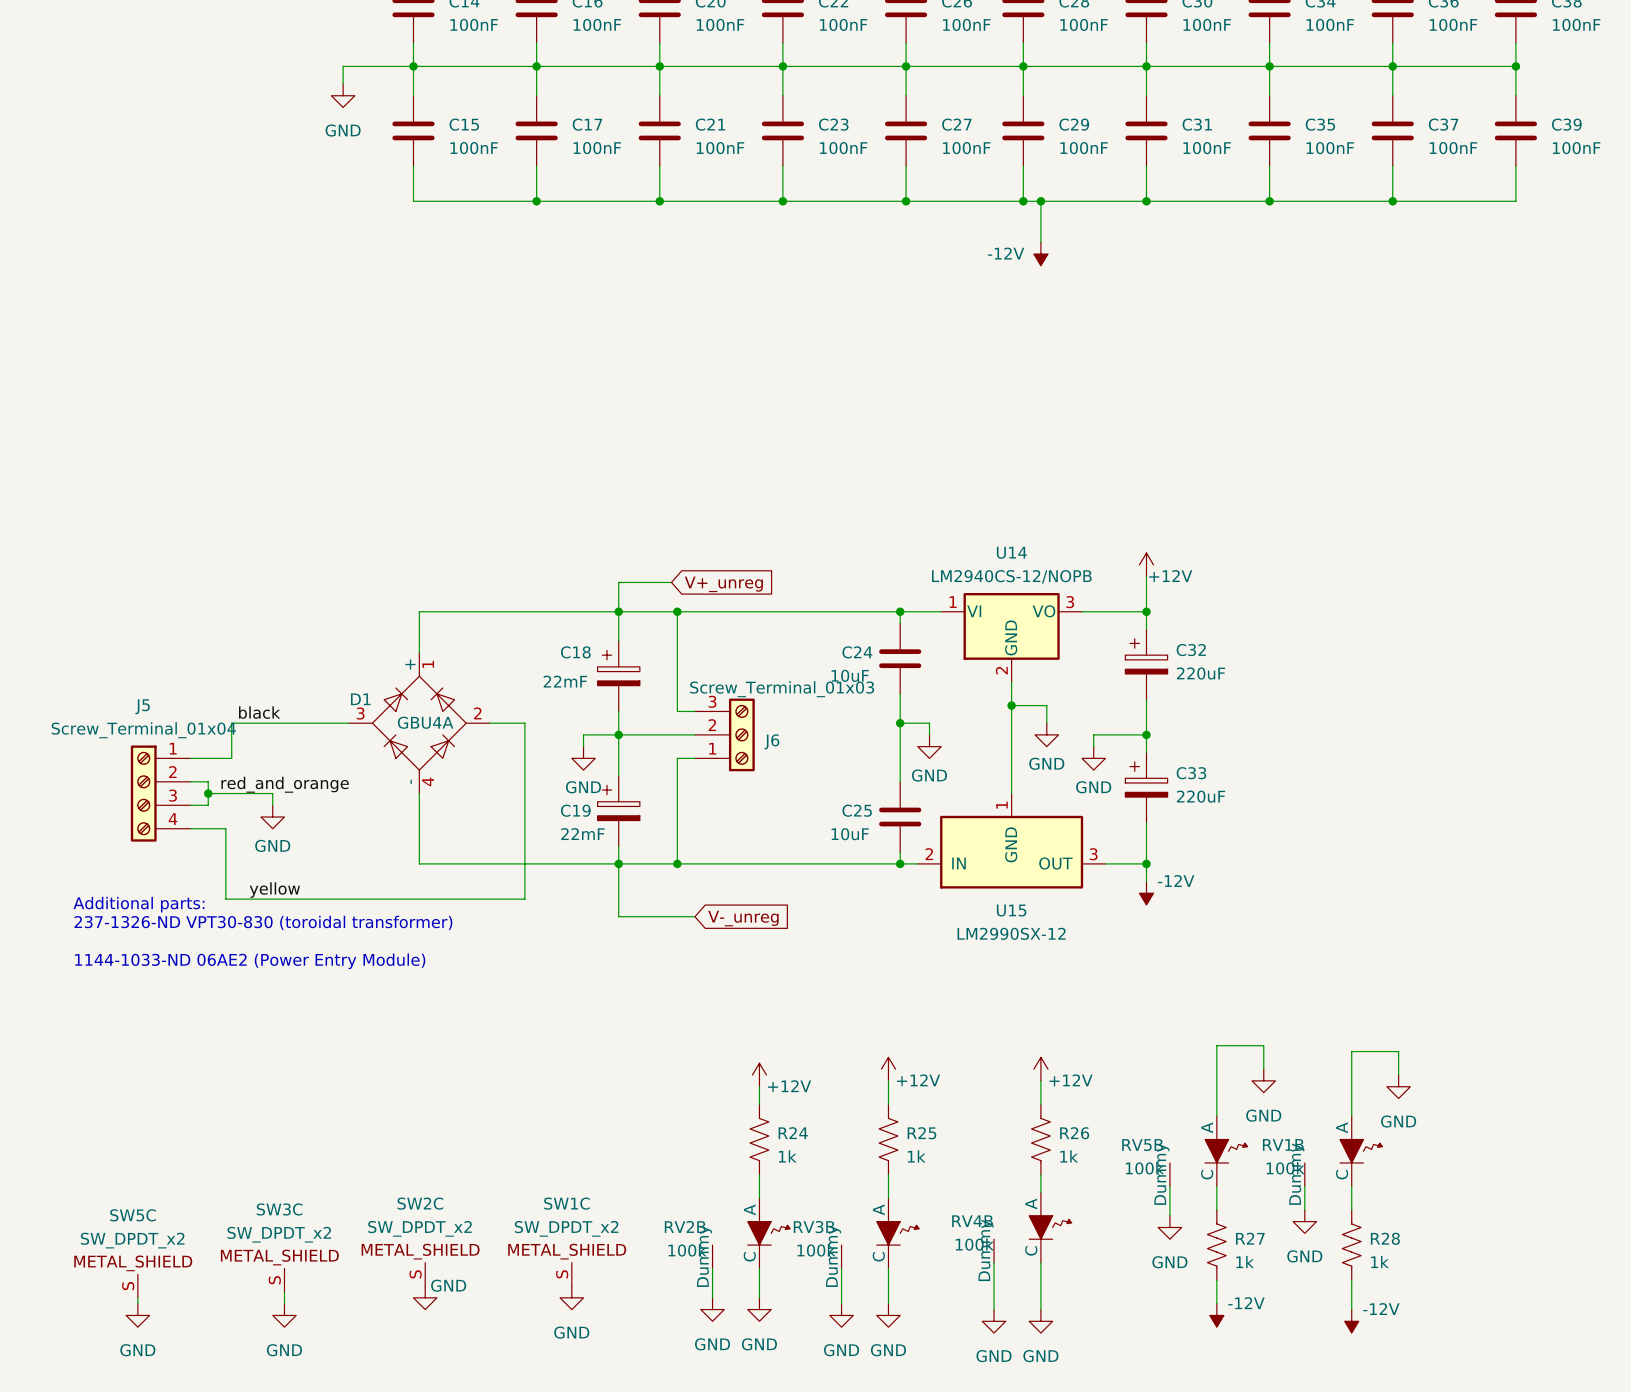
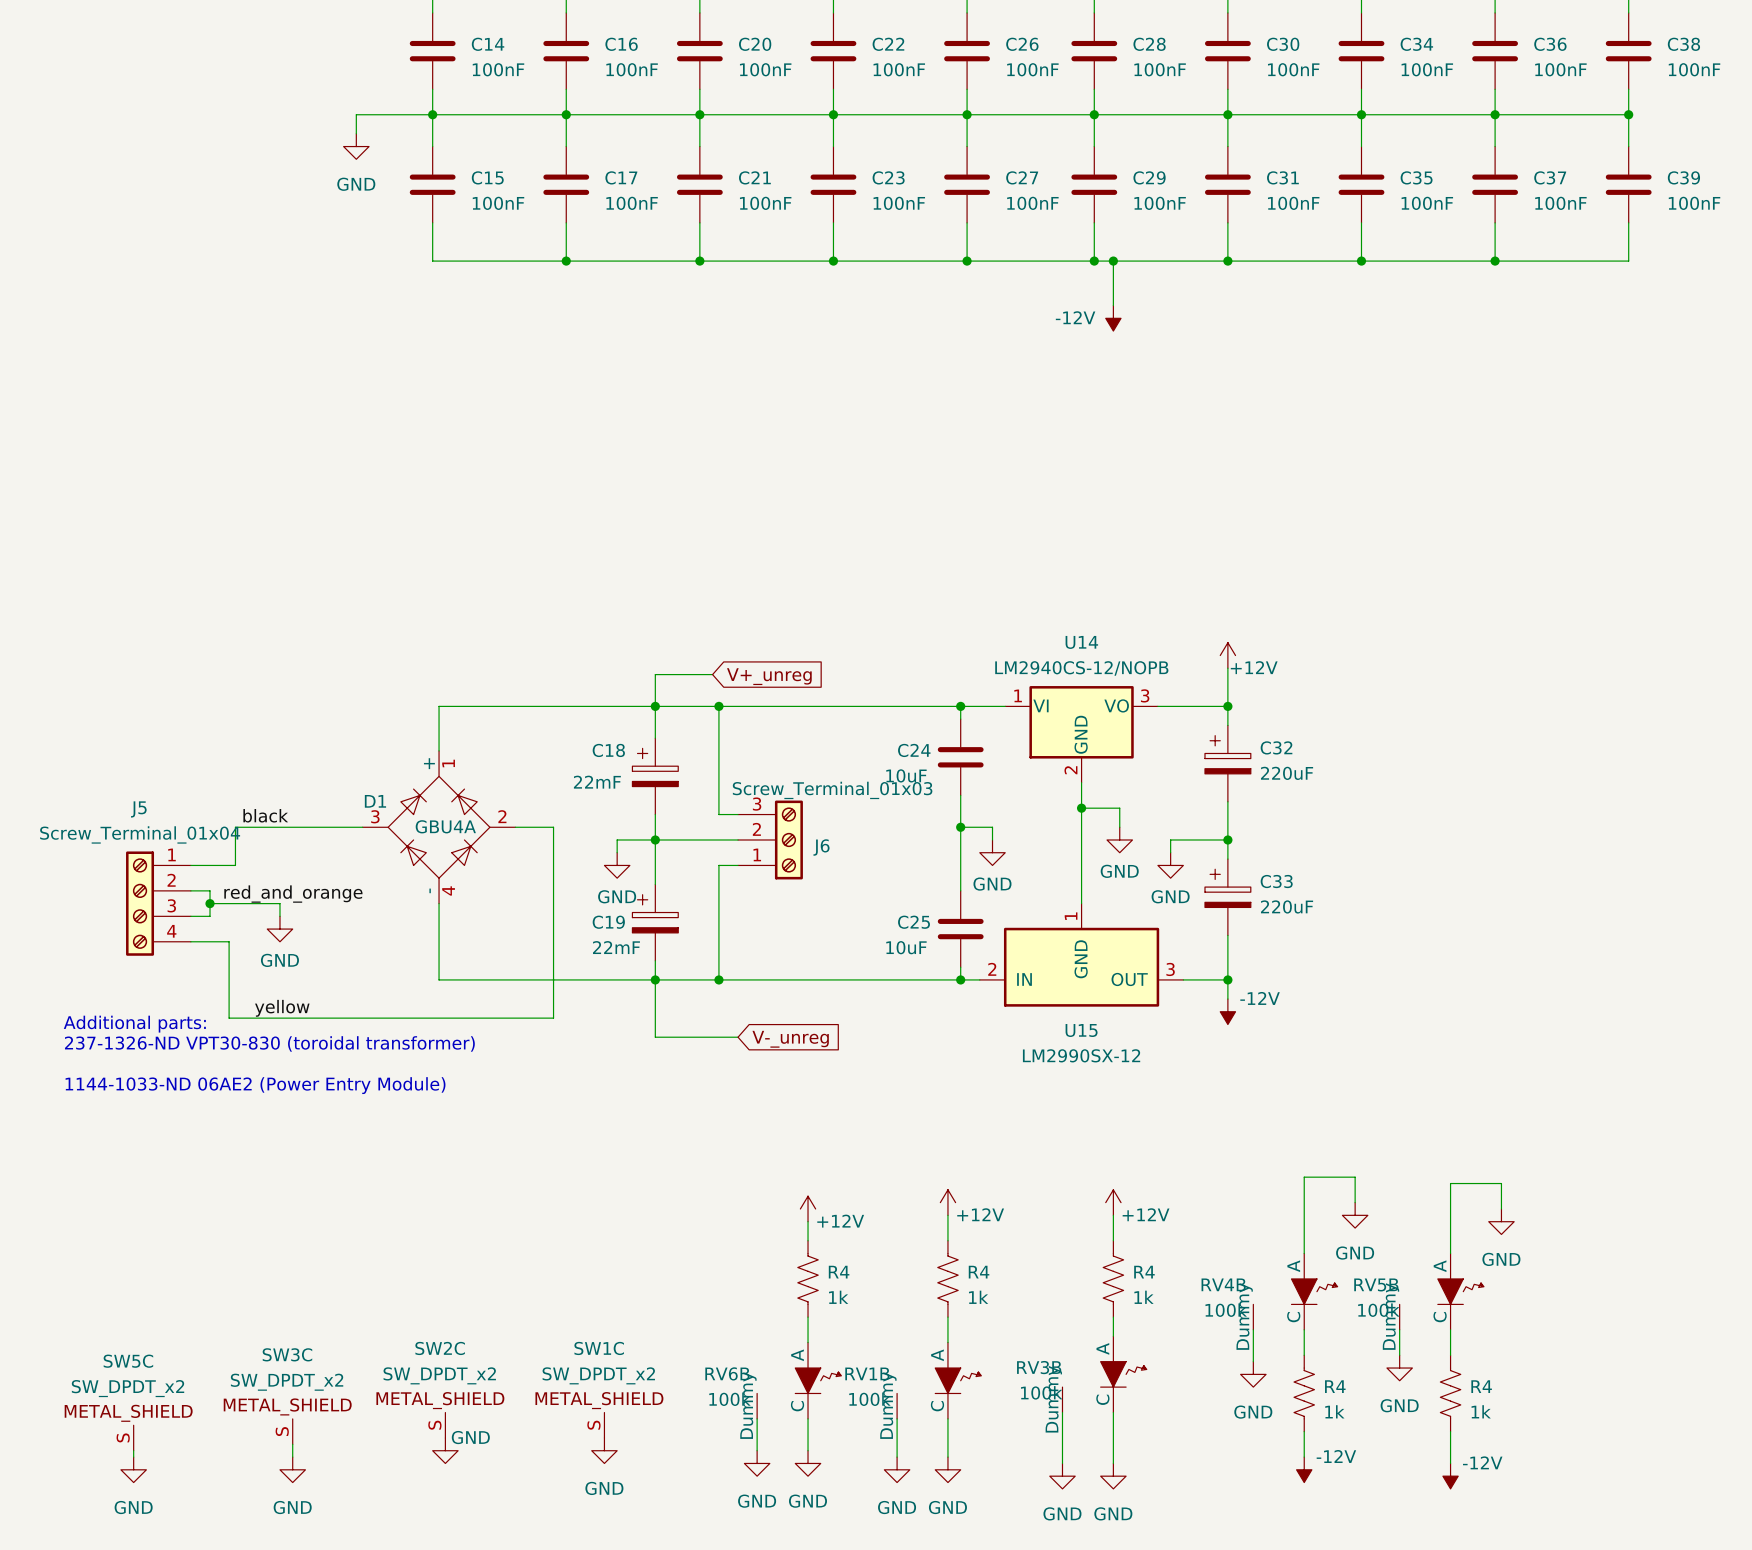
R24 name: R24 (793, 1133) -> R4 (839, 1272)
R25 name: R25 (921, 1133) -> R4 (979, 1272)
R26 name: R26 (1074, 1133) -> R4 (1144, 1272)
RV1B name: RV1B (1283, 1144) -> RV5B (1376, 1284)
RV5B name: RV5B (1142, 1145) -> RV4B (1223, 1284)
RV4B name: RV4B (972, 1221) -> RV3B (1039, 1367)
RV2B name: RV2B (685, 1226) -> RV6B (727, 1373)
RV3B name: RV3B (814, 1227) -> RV1B (867, 1373)
R27 name: R27 (1250, 1238) -> R4 (1335, 1386)
R28 name: R28 (1385, 1238) -> R4 (1481, 1386)

